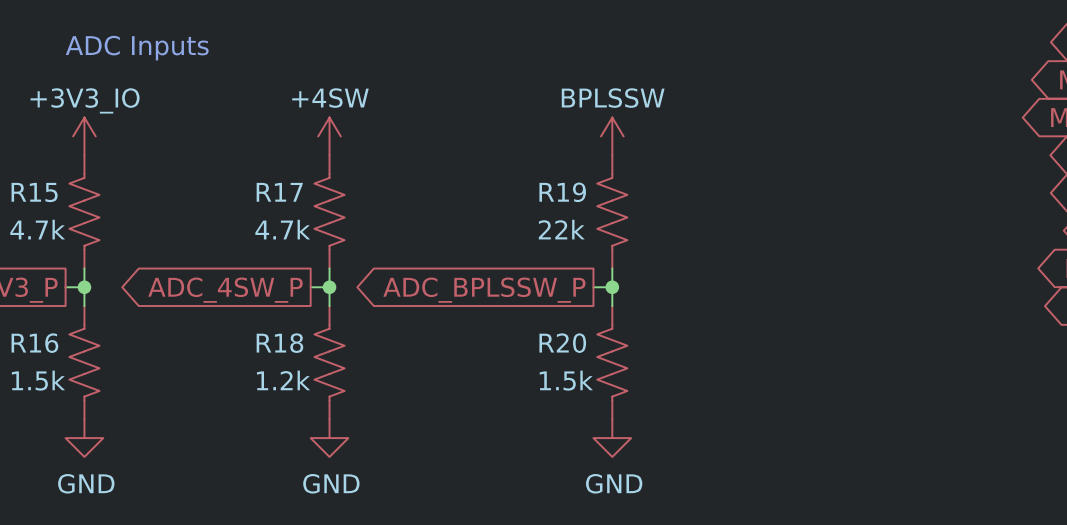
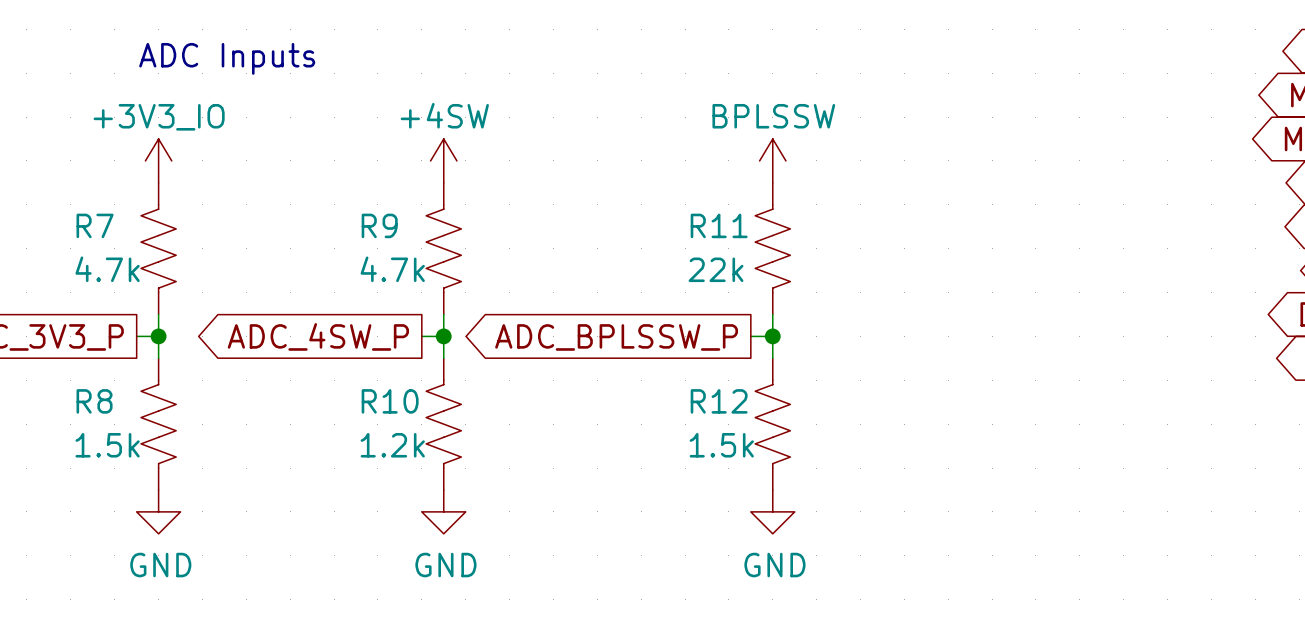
R15 name: R15 (34, 192) -> R7 (95, 225)
R17 name: R17 (279, 192) -> R9 (379, 225)
R19 name: R19 (562, 192) -> R11 (719, 225)
R16 name: R16 (34, 343) -> R8 (94, 401)
R18 name: R18 (279, 343) -> R10 (390, 401)
R20 name: R20 (562, 343) -> R12 (719, 401)

